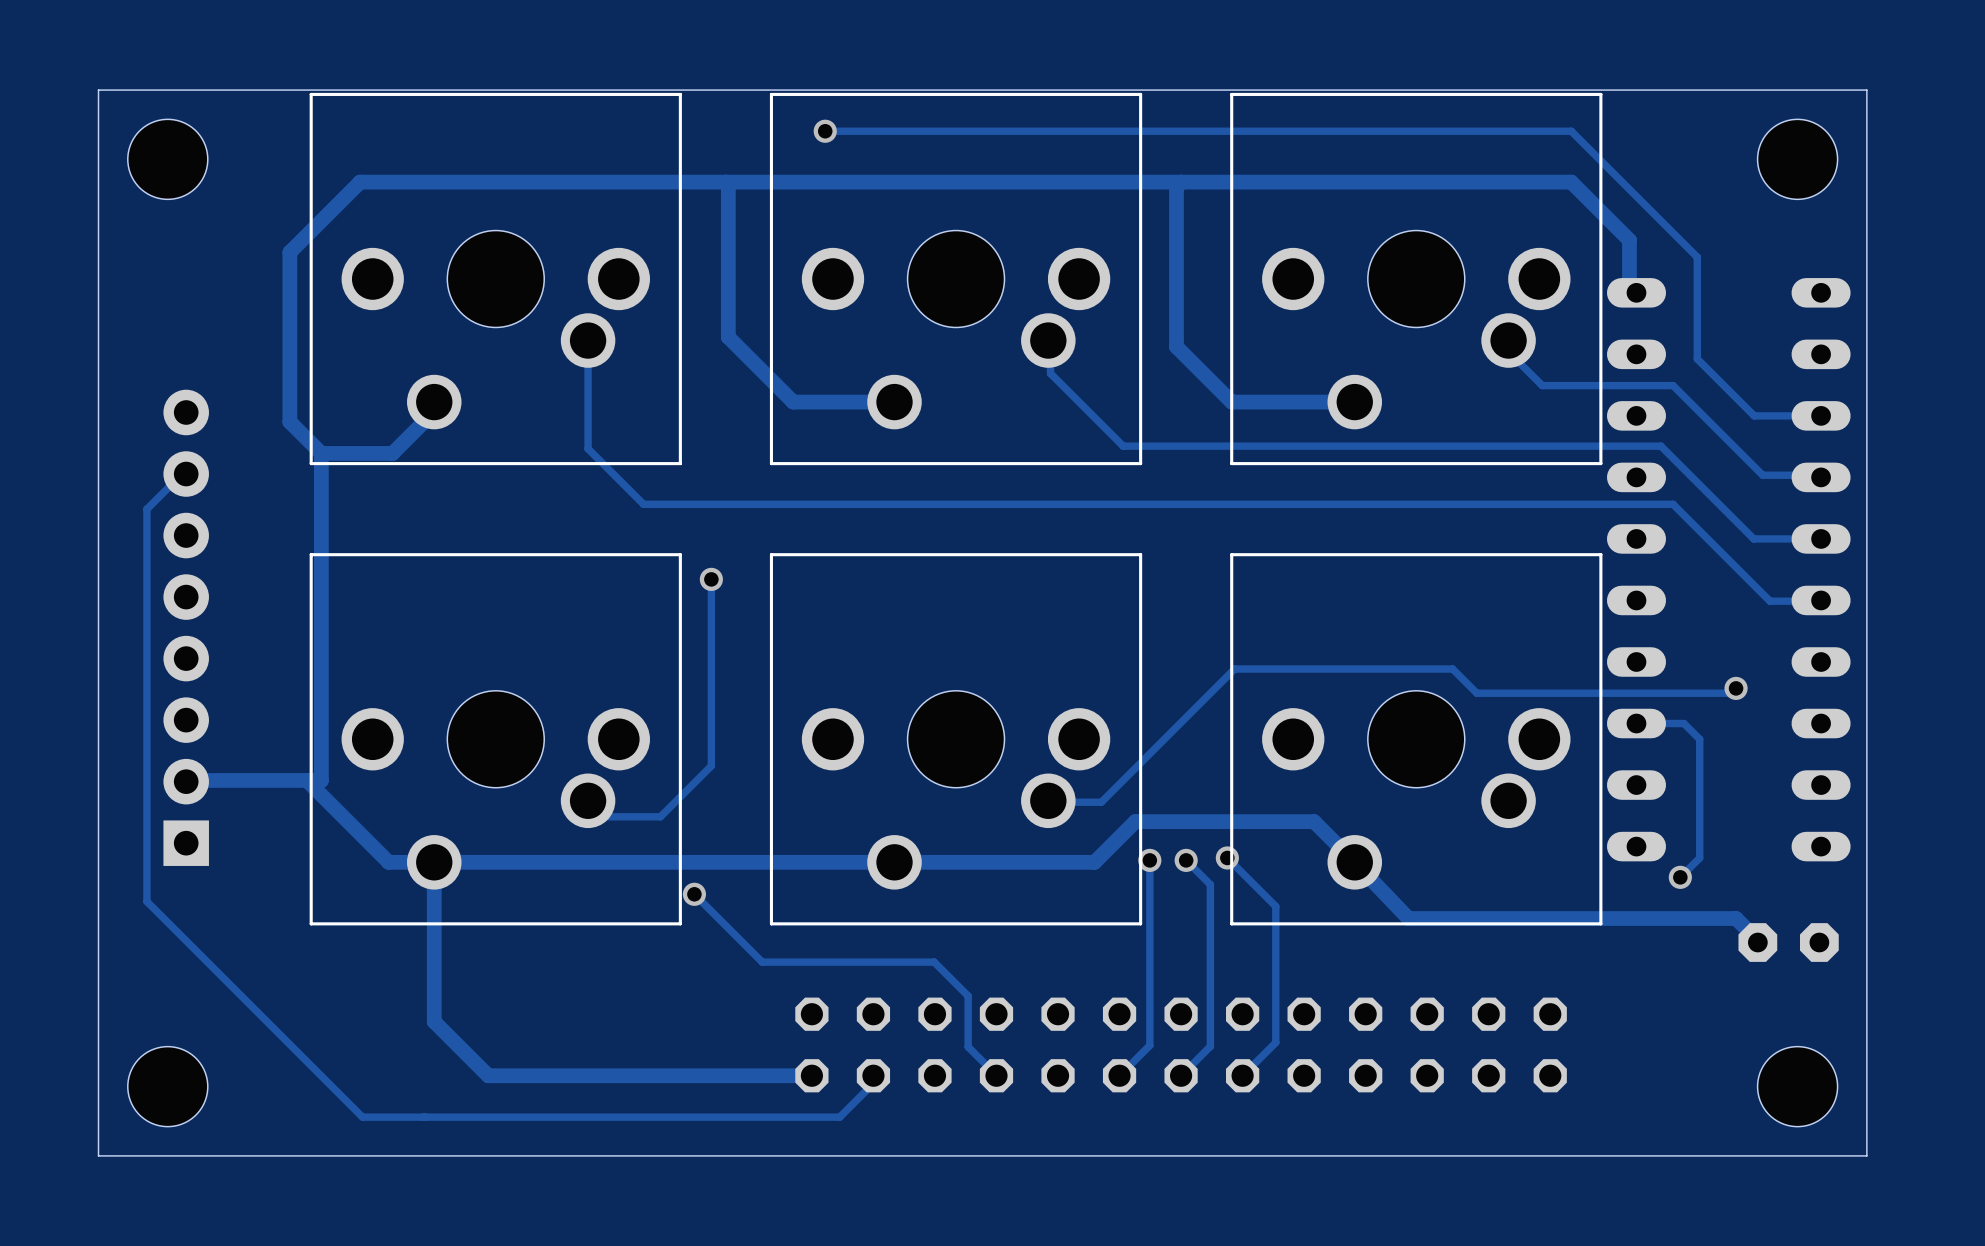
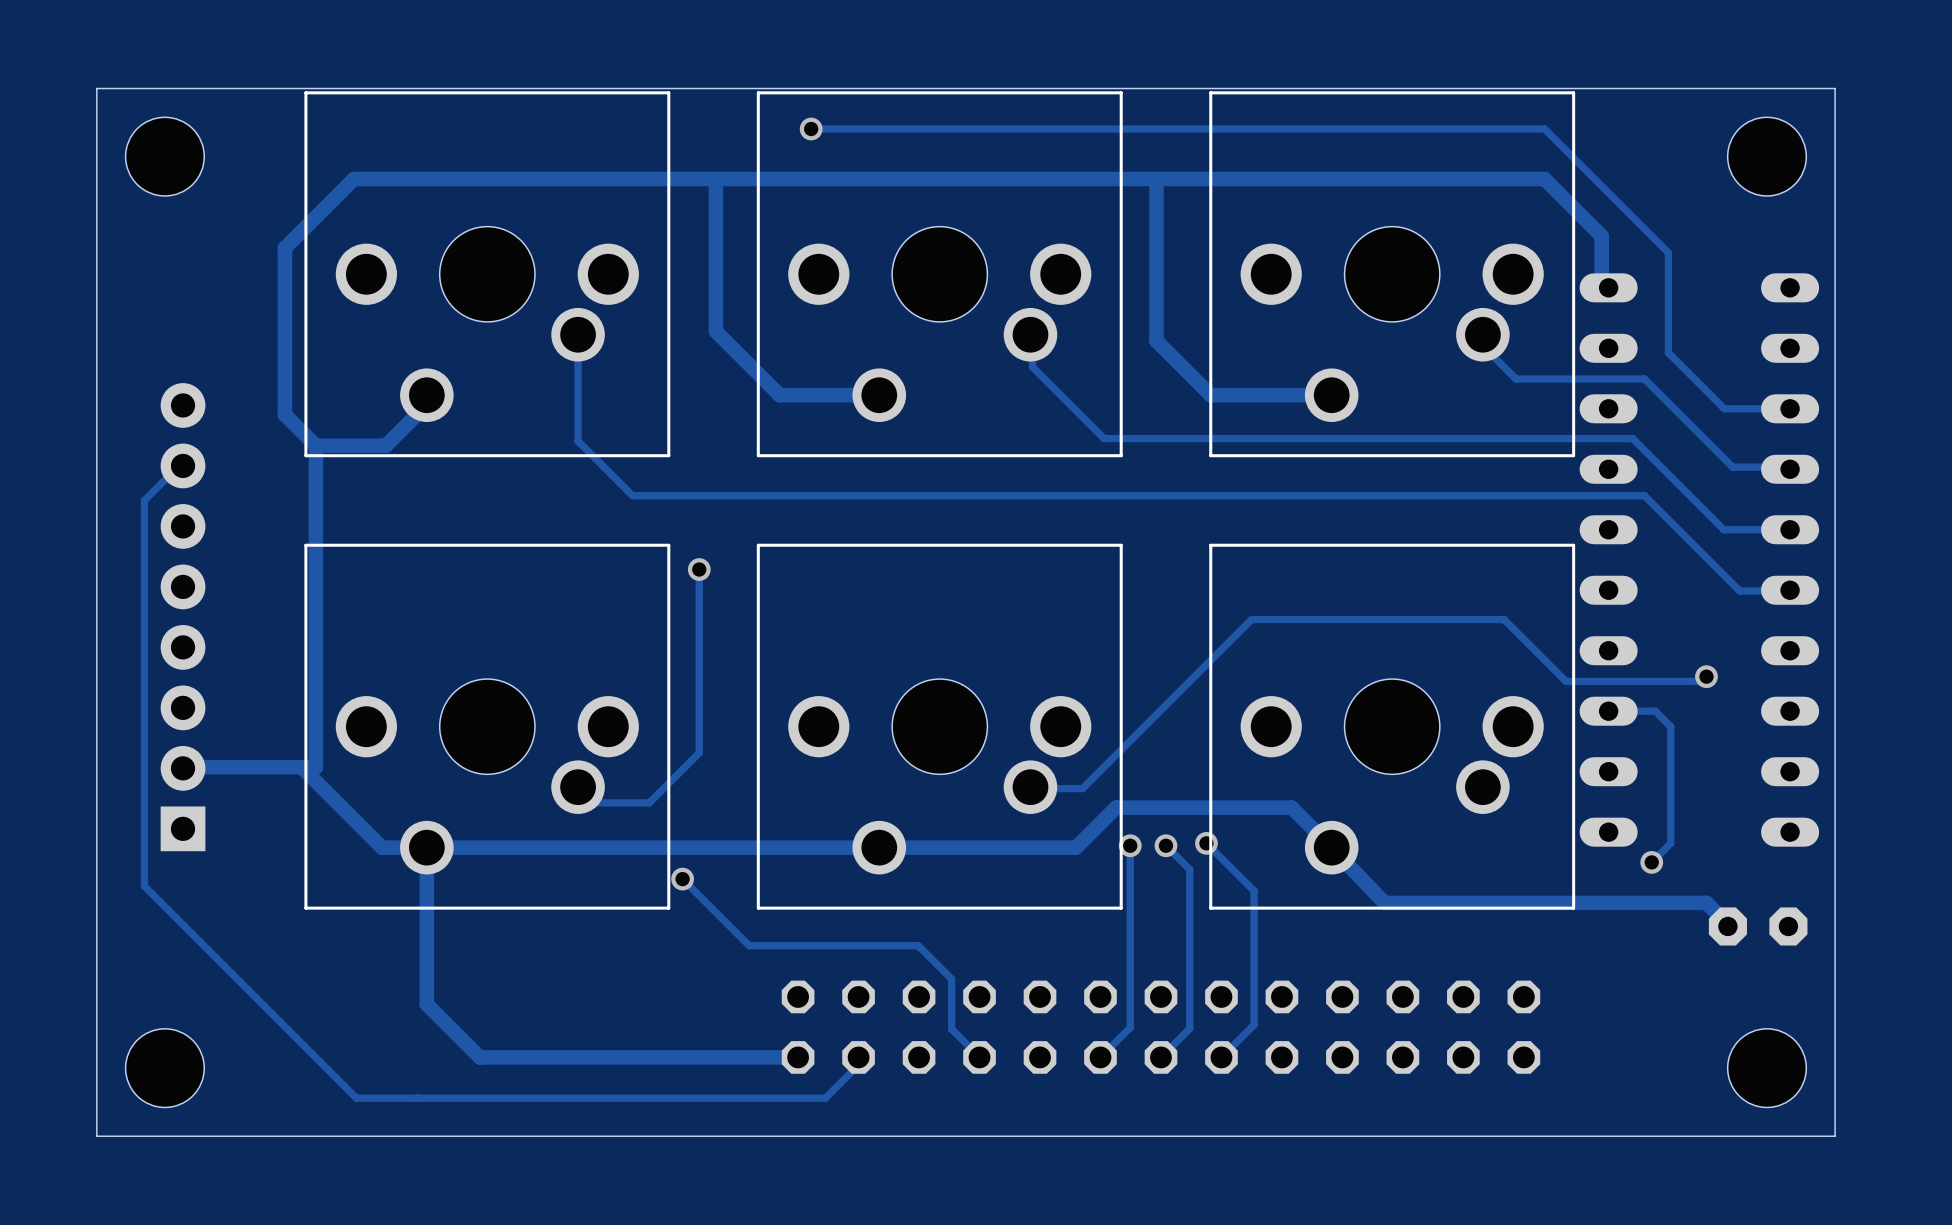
track: (1234, 669) (1452, 669) (1476, 693) (1593, 693) -> (1213, 657) (1251, 619) (1504, 619) (1566, 681)

